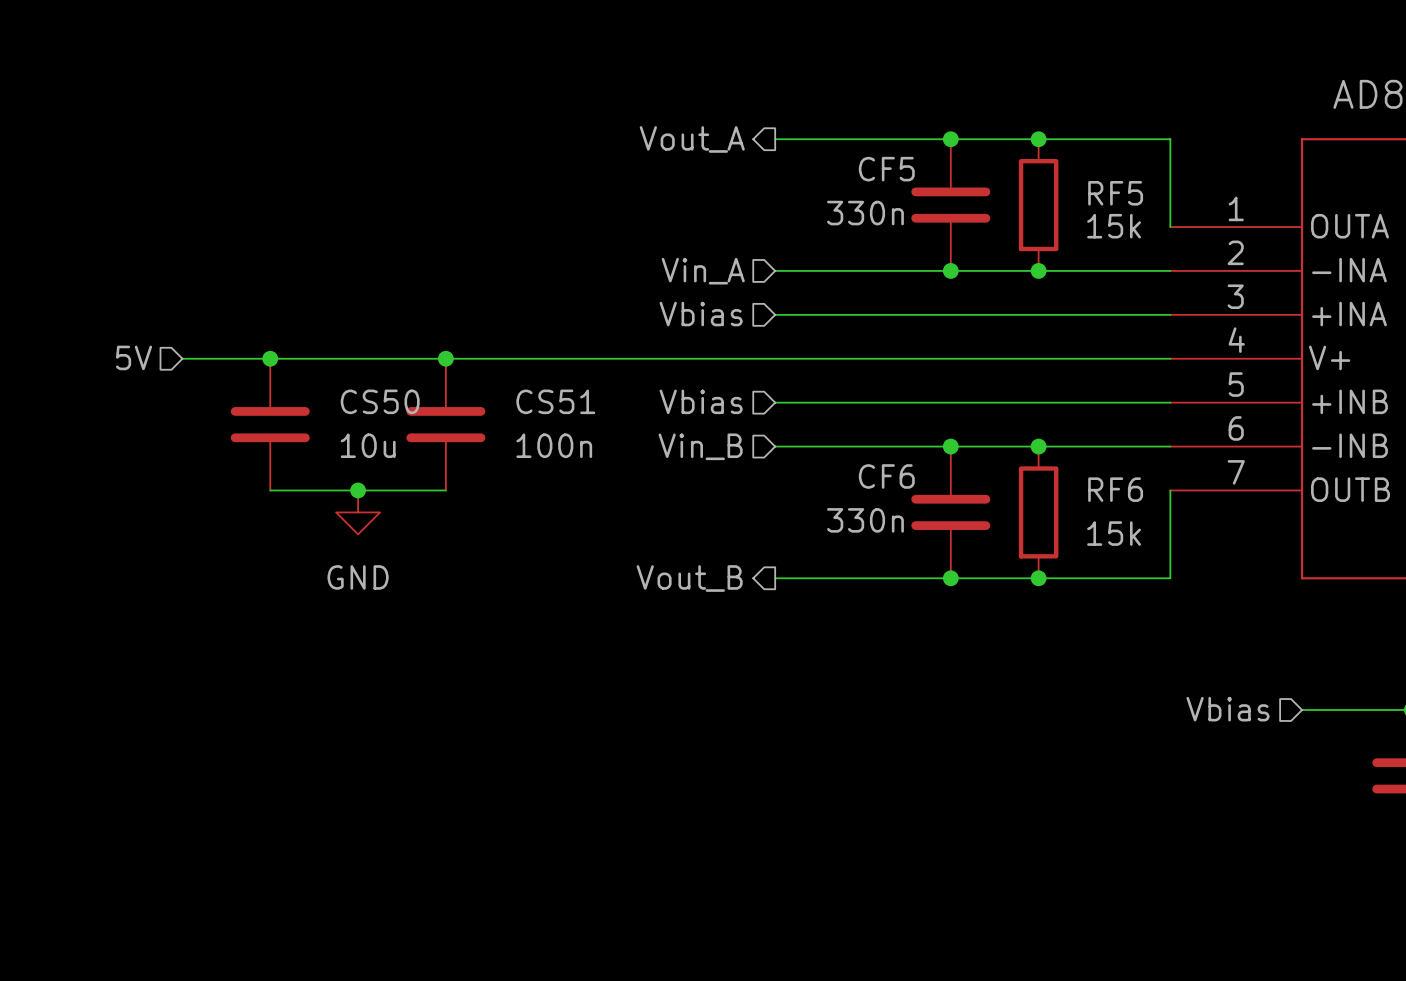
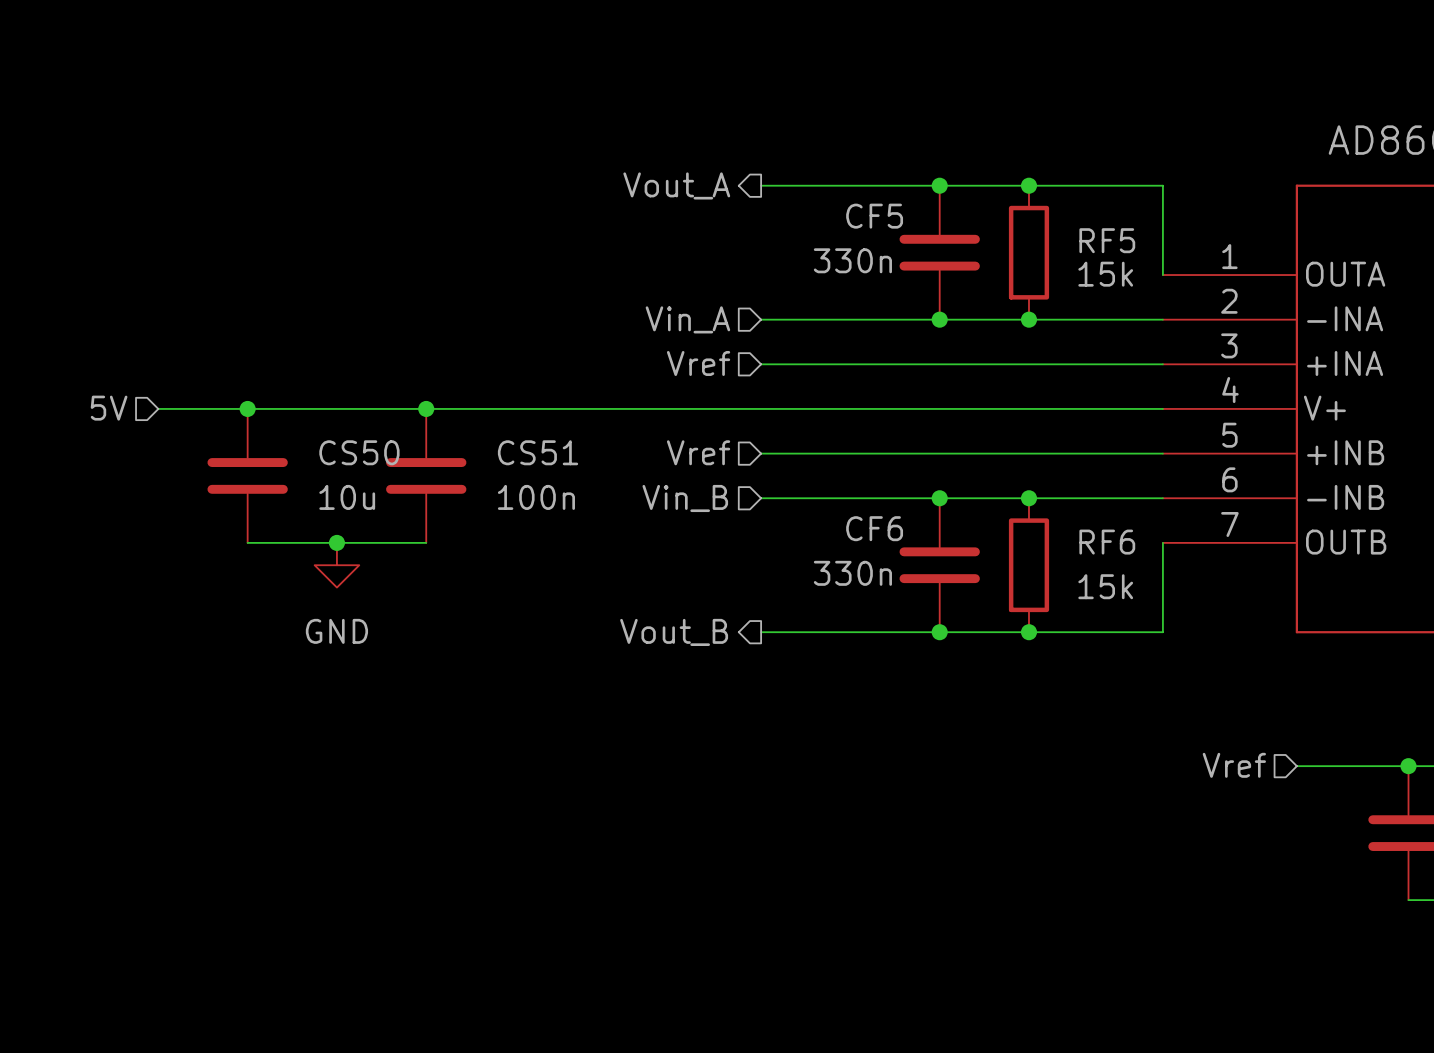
hierarchical label: Vbias (701, 314) -> Vref (698, 363)
hierarchical label: Vbias (701, 401) -> Vref (698, 452)
hierarchical label: Vbias (1228, 709) -> Vref (1234, 765)

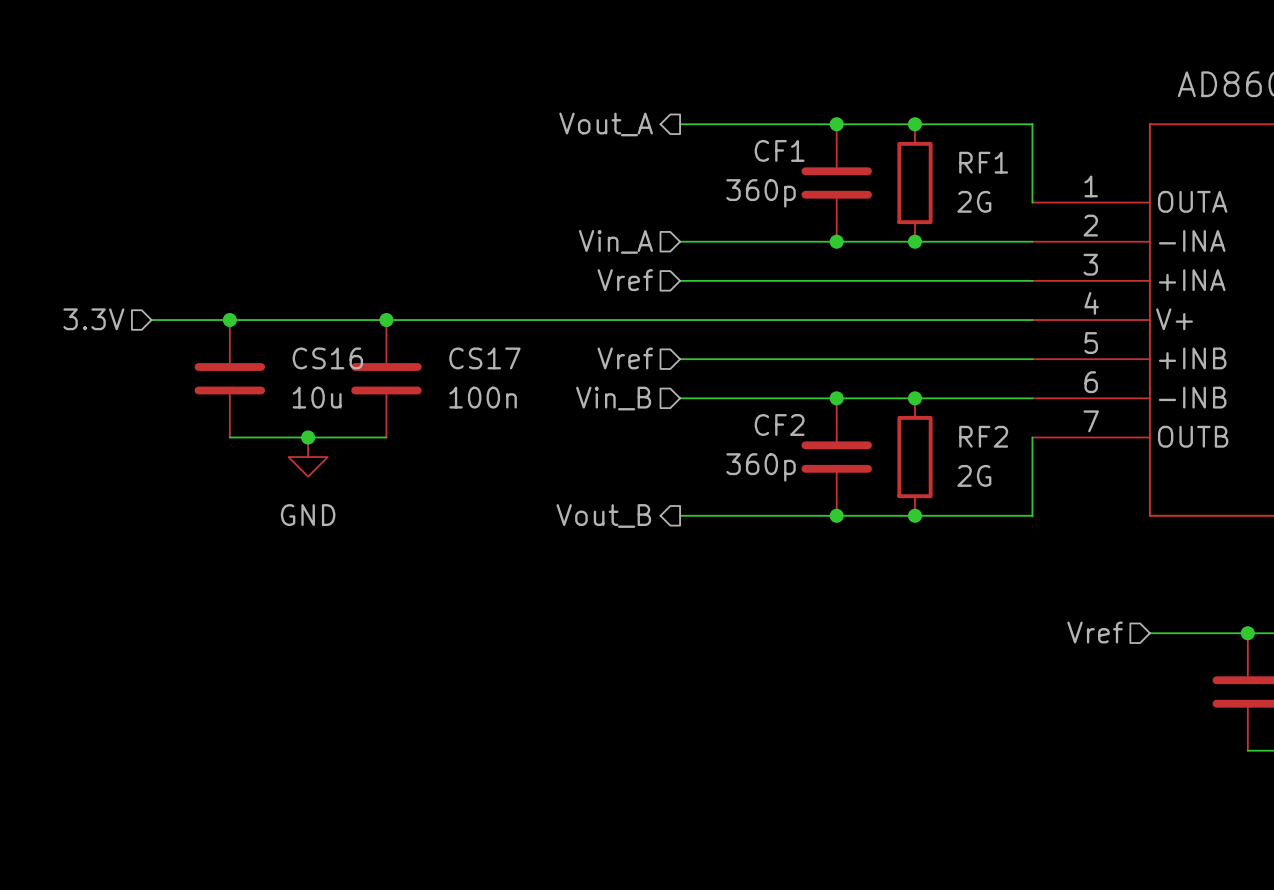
CF5 name: CF5 (874, 216) -> CF1 (779, 150)
RF5 name: RF5 (1107, 240) -> RF1 (983, 162)
CF5 value: 330n (852, 260) -> 360p (761, 193)
RF5 value: 15k (1105, 274) -> 2G (974, 201)
hierarchical label: 5V (109, 408) -> 3.3V (93, 319)
CS50 name: CS50 (359, 452) -> CS16 (327, 358)
CS51 name: CS51 (538, 452) -> CS17 (484, 358)
CF6 name: CF6 (874, 528) -> CF2 (779, 425)
RF6 name: RF6 (1107, 542) -> RF2 (983, 436)
CF6 value: 330n (852, 573) -> 360p (761, 467)
RF6 value: 15k (1105, 586) -> 2G (974, 475)

